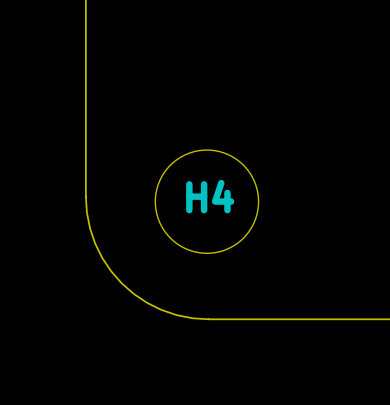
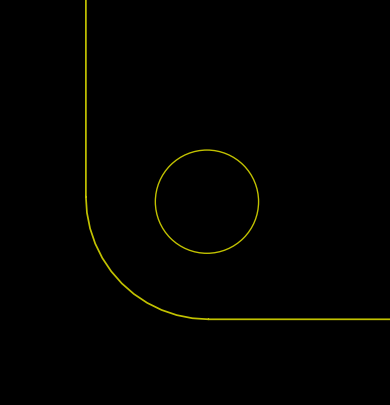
H4 name: H4 (210, 196) -> none

